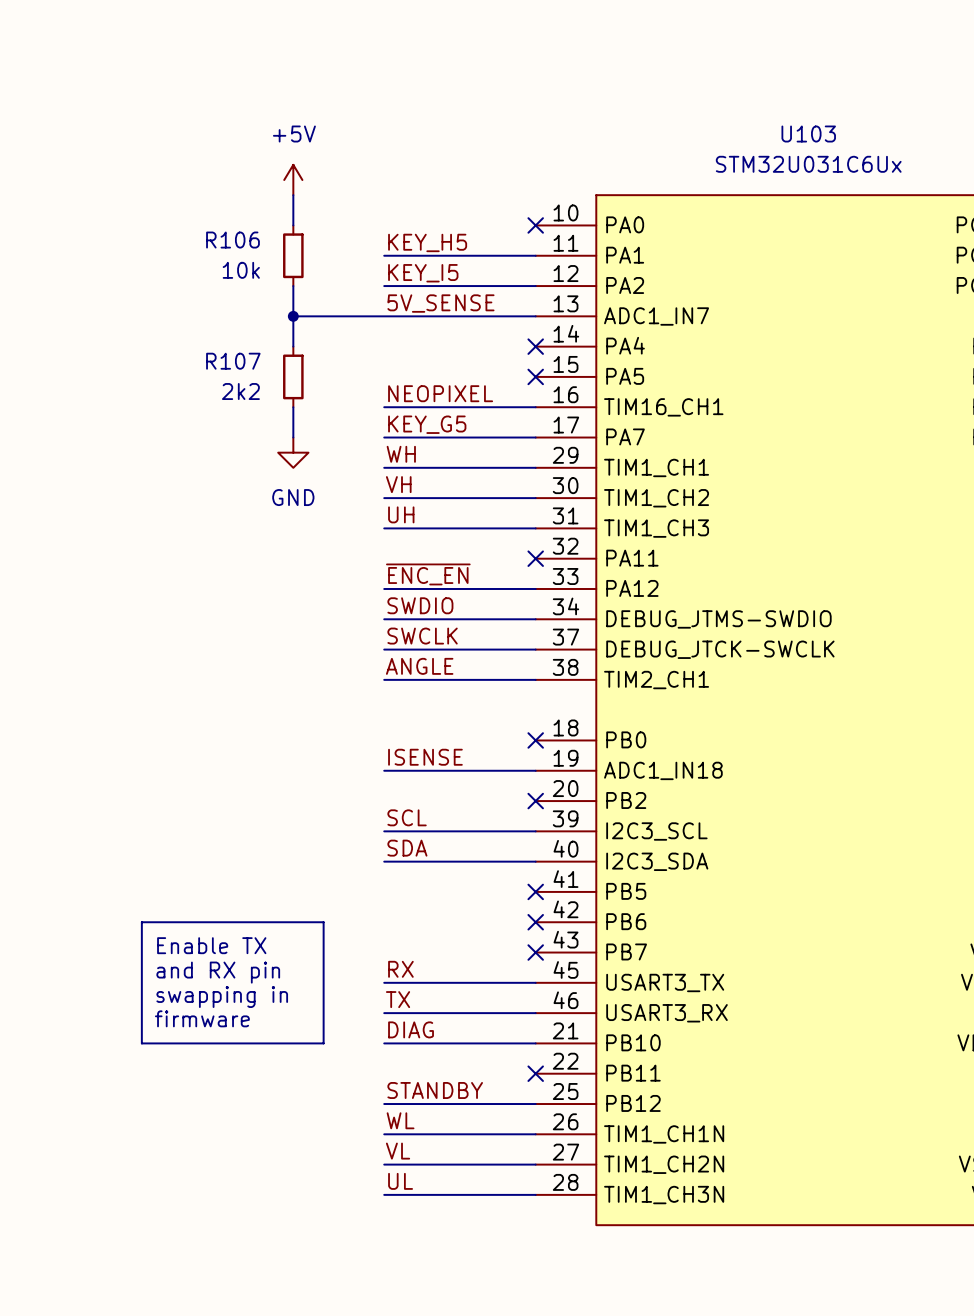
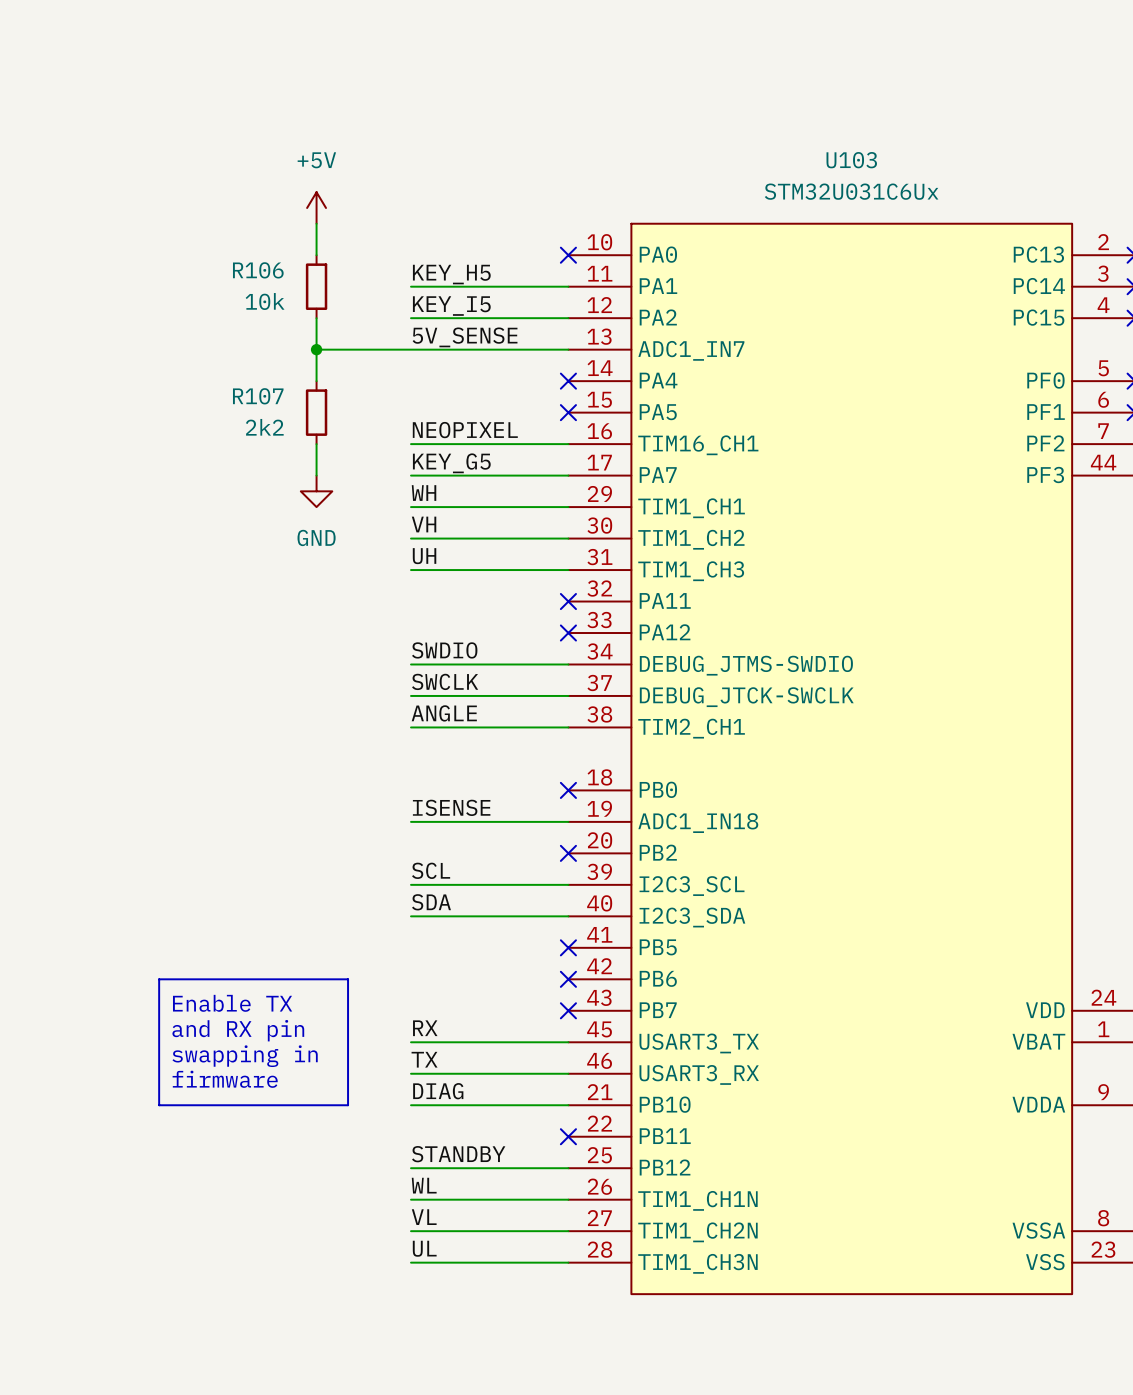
label: ~{ENC_EN} (428, 574) -> none
wire: (384, 588) (535, 588) -> none
no-connect mark: none -> (568, 633)

